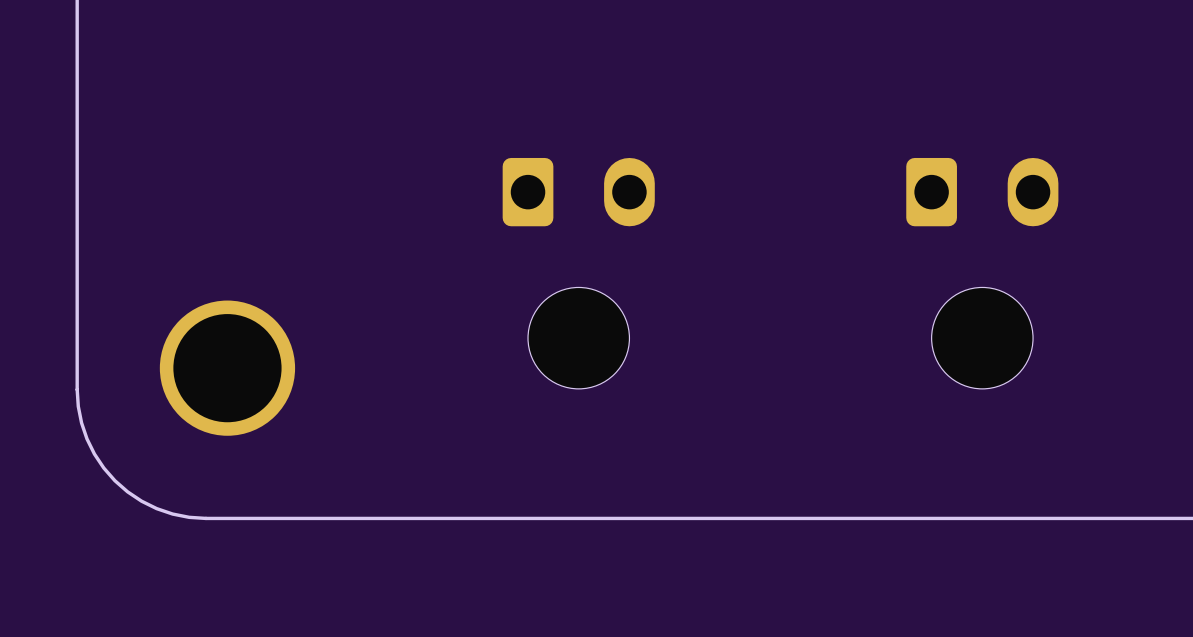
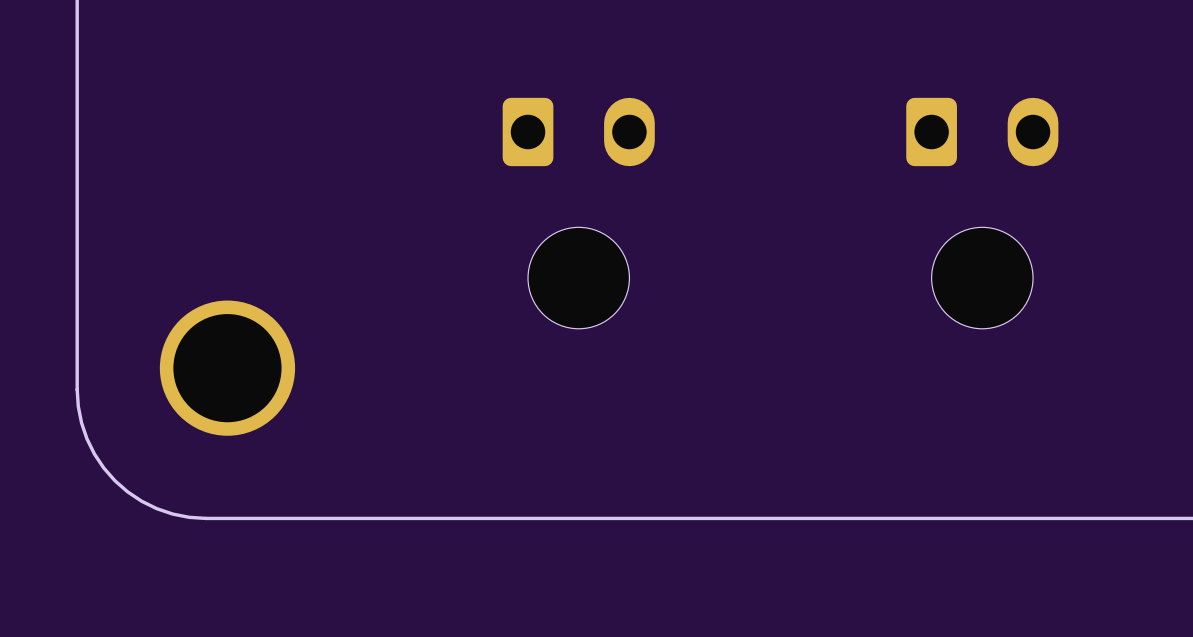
part position: (578, 273) -> (578, 213)
part position: (982, 273) -> (982, 213)

